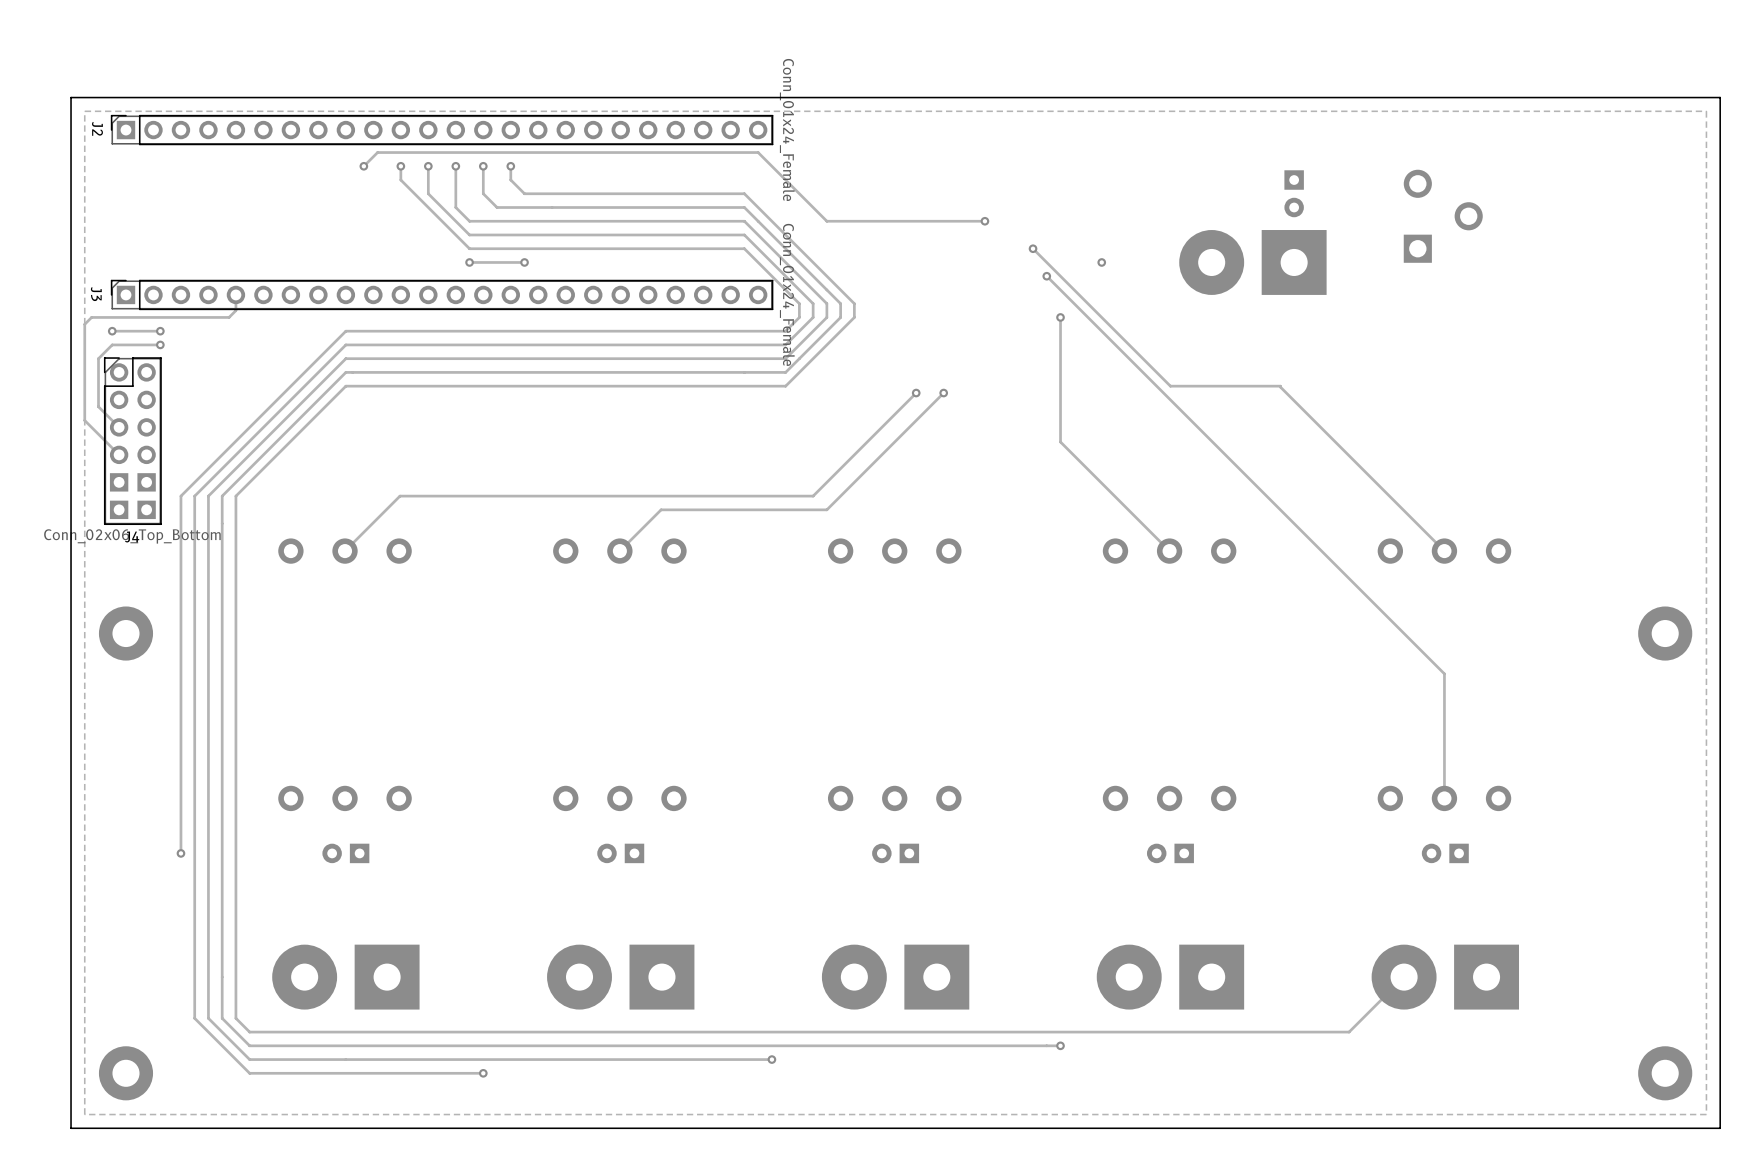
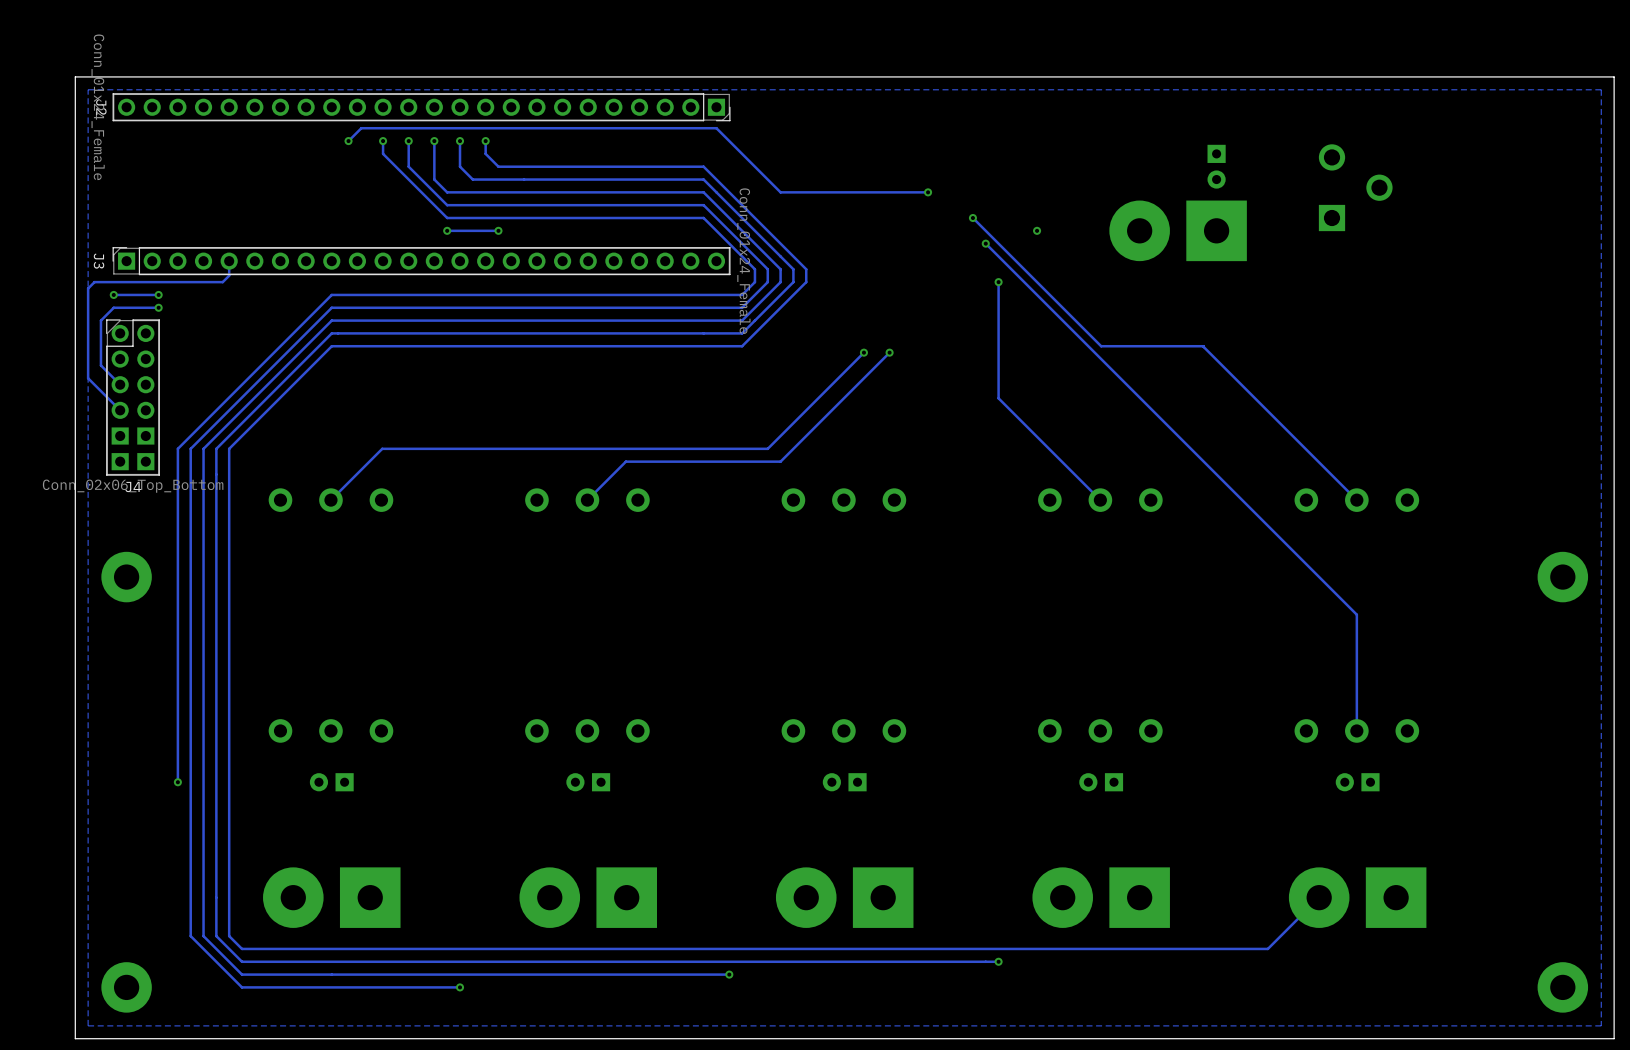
J2 rotation: 0° (442, 130) -> 180° (421, 107)

